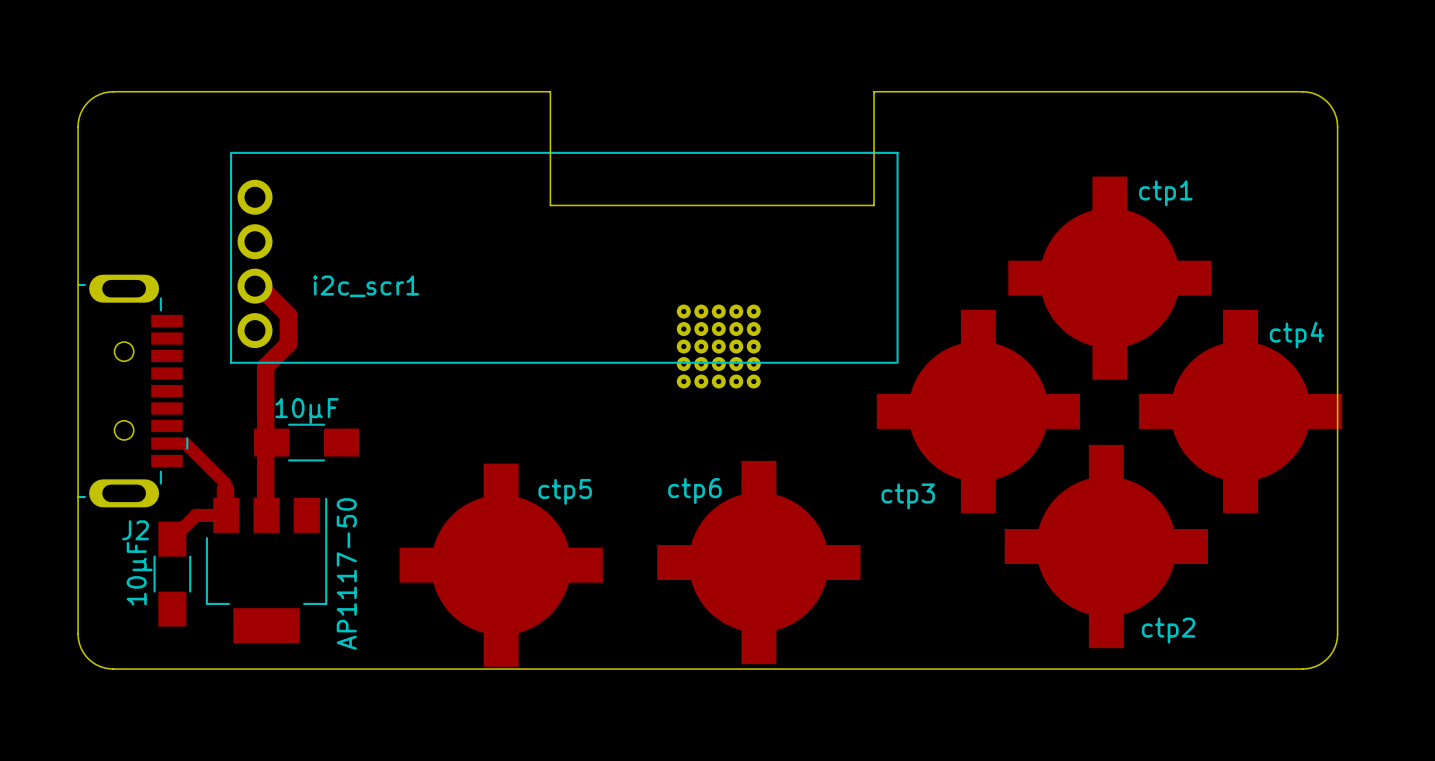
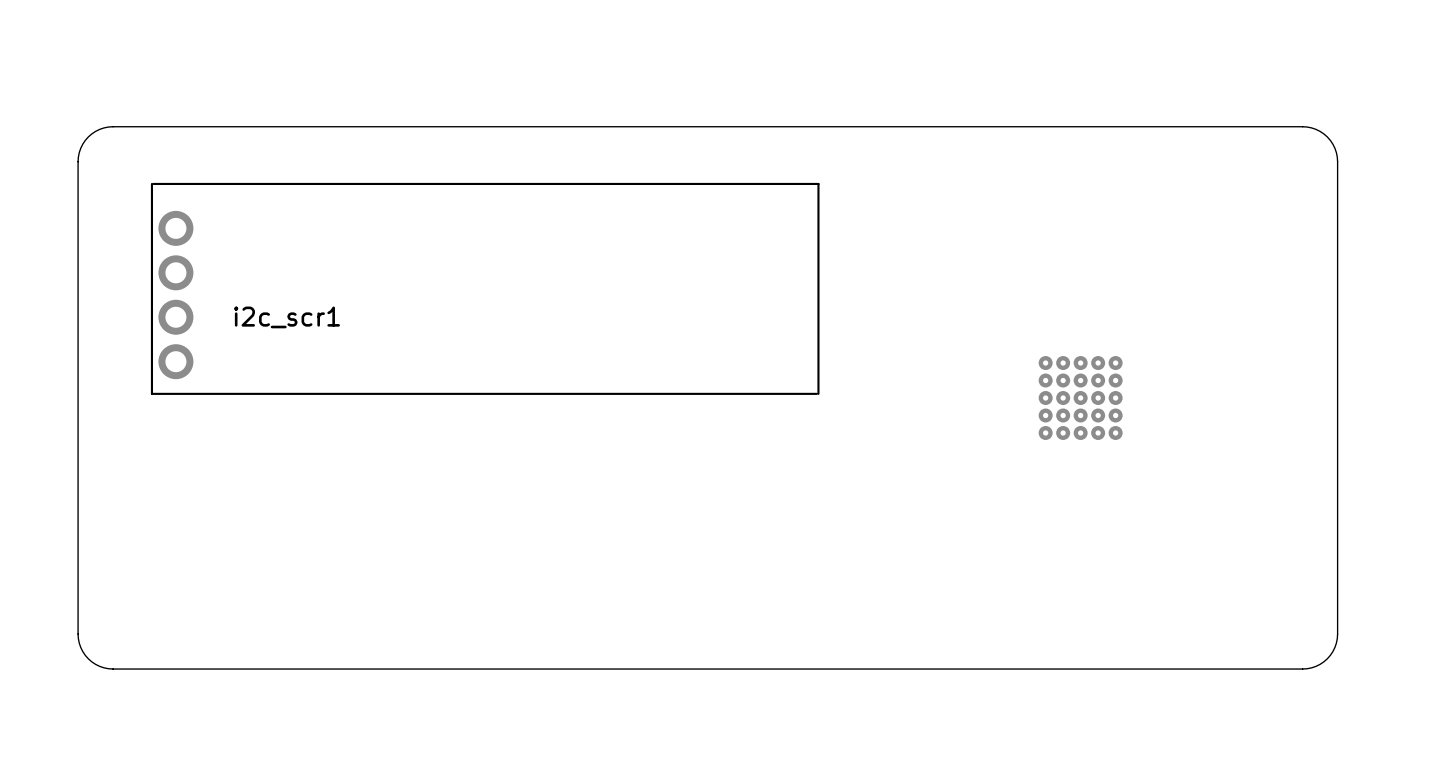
board edge: (78, 161) (78, 122) (82, 109) (95, 96) (113, 91) (550, 91) (550, 205) (874, 205) (874, 91) (1307, 92) (1323, 98) (1334, 113) (1337, 126) (1337, 161) -> (78, 161) (80, 148) (88, 136) (99, 129) (113, 126) (1302, 126) (1316, 129) (1327, 136) (1334, 148) (1337, 161)
i2c_scr1 position: (564, 257) -> (485, 288)
ctp1: (1109, 278) -> none
track: (258, 285) (288, 315) (288, 343) (265, 366) (265, 515) -> none
part position: (718, 346) -> (1080, 398)
J2: (132, 391) -> none
ctp3: (978, 411) -> none
ctp4: (1240, 411) -> none
part: 10µF (306, 442) -> none
track: (166, 443) (185, 443) (225, 483) (225, 515) -> none
track: (226, 515) (196, 515) (172, 539) -> none
ctp2: (1106, 546) -> none
ctp6: (758, 562) -> none
ctp5: (501, 565) -> none
part: AP1117-50 (266, 570) -> none
part: 10µF (172, 574) -> none

